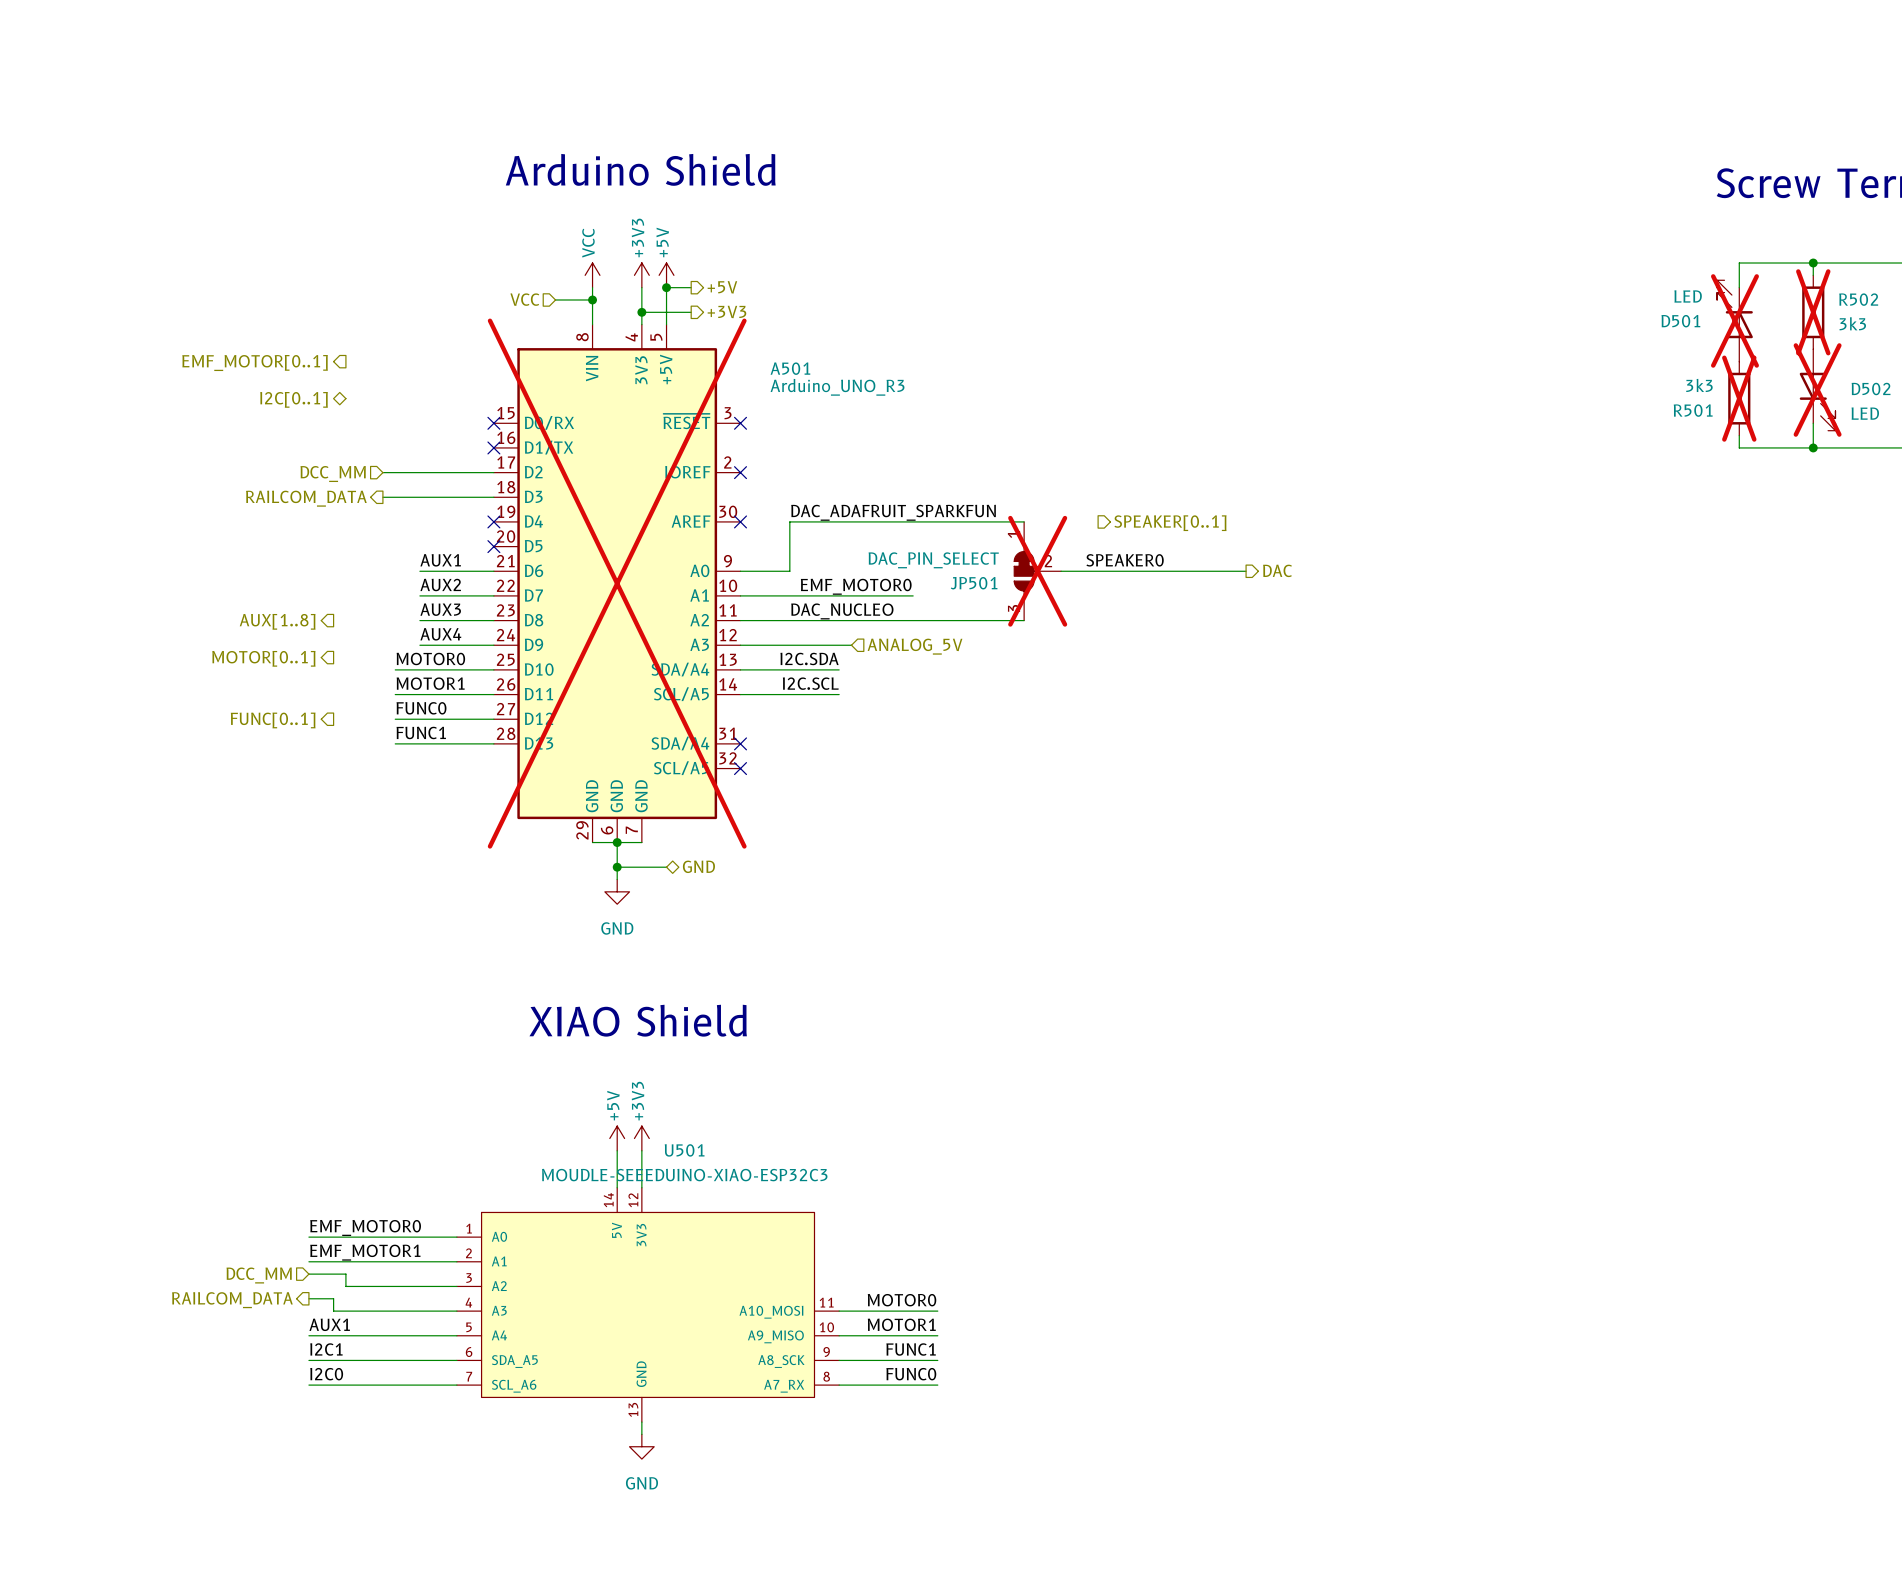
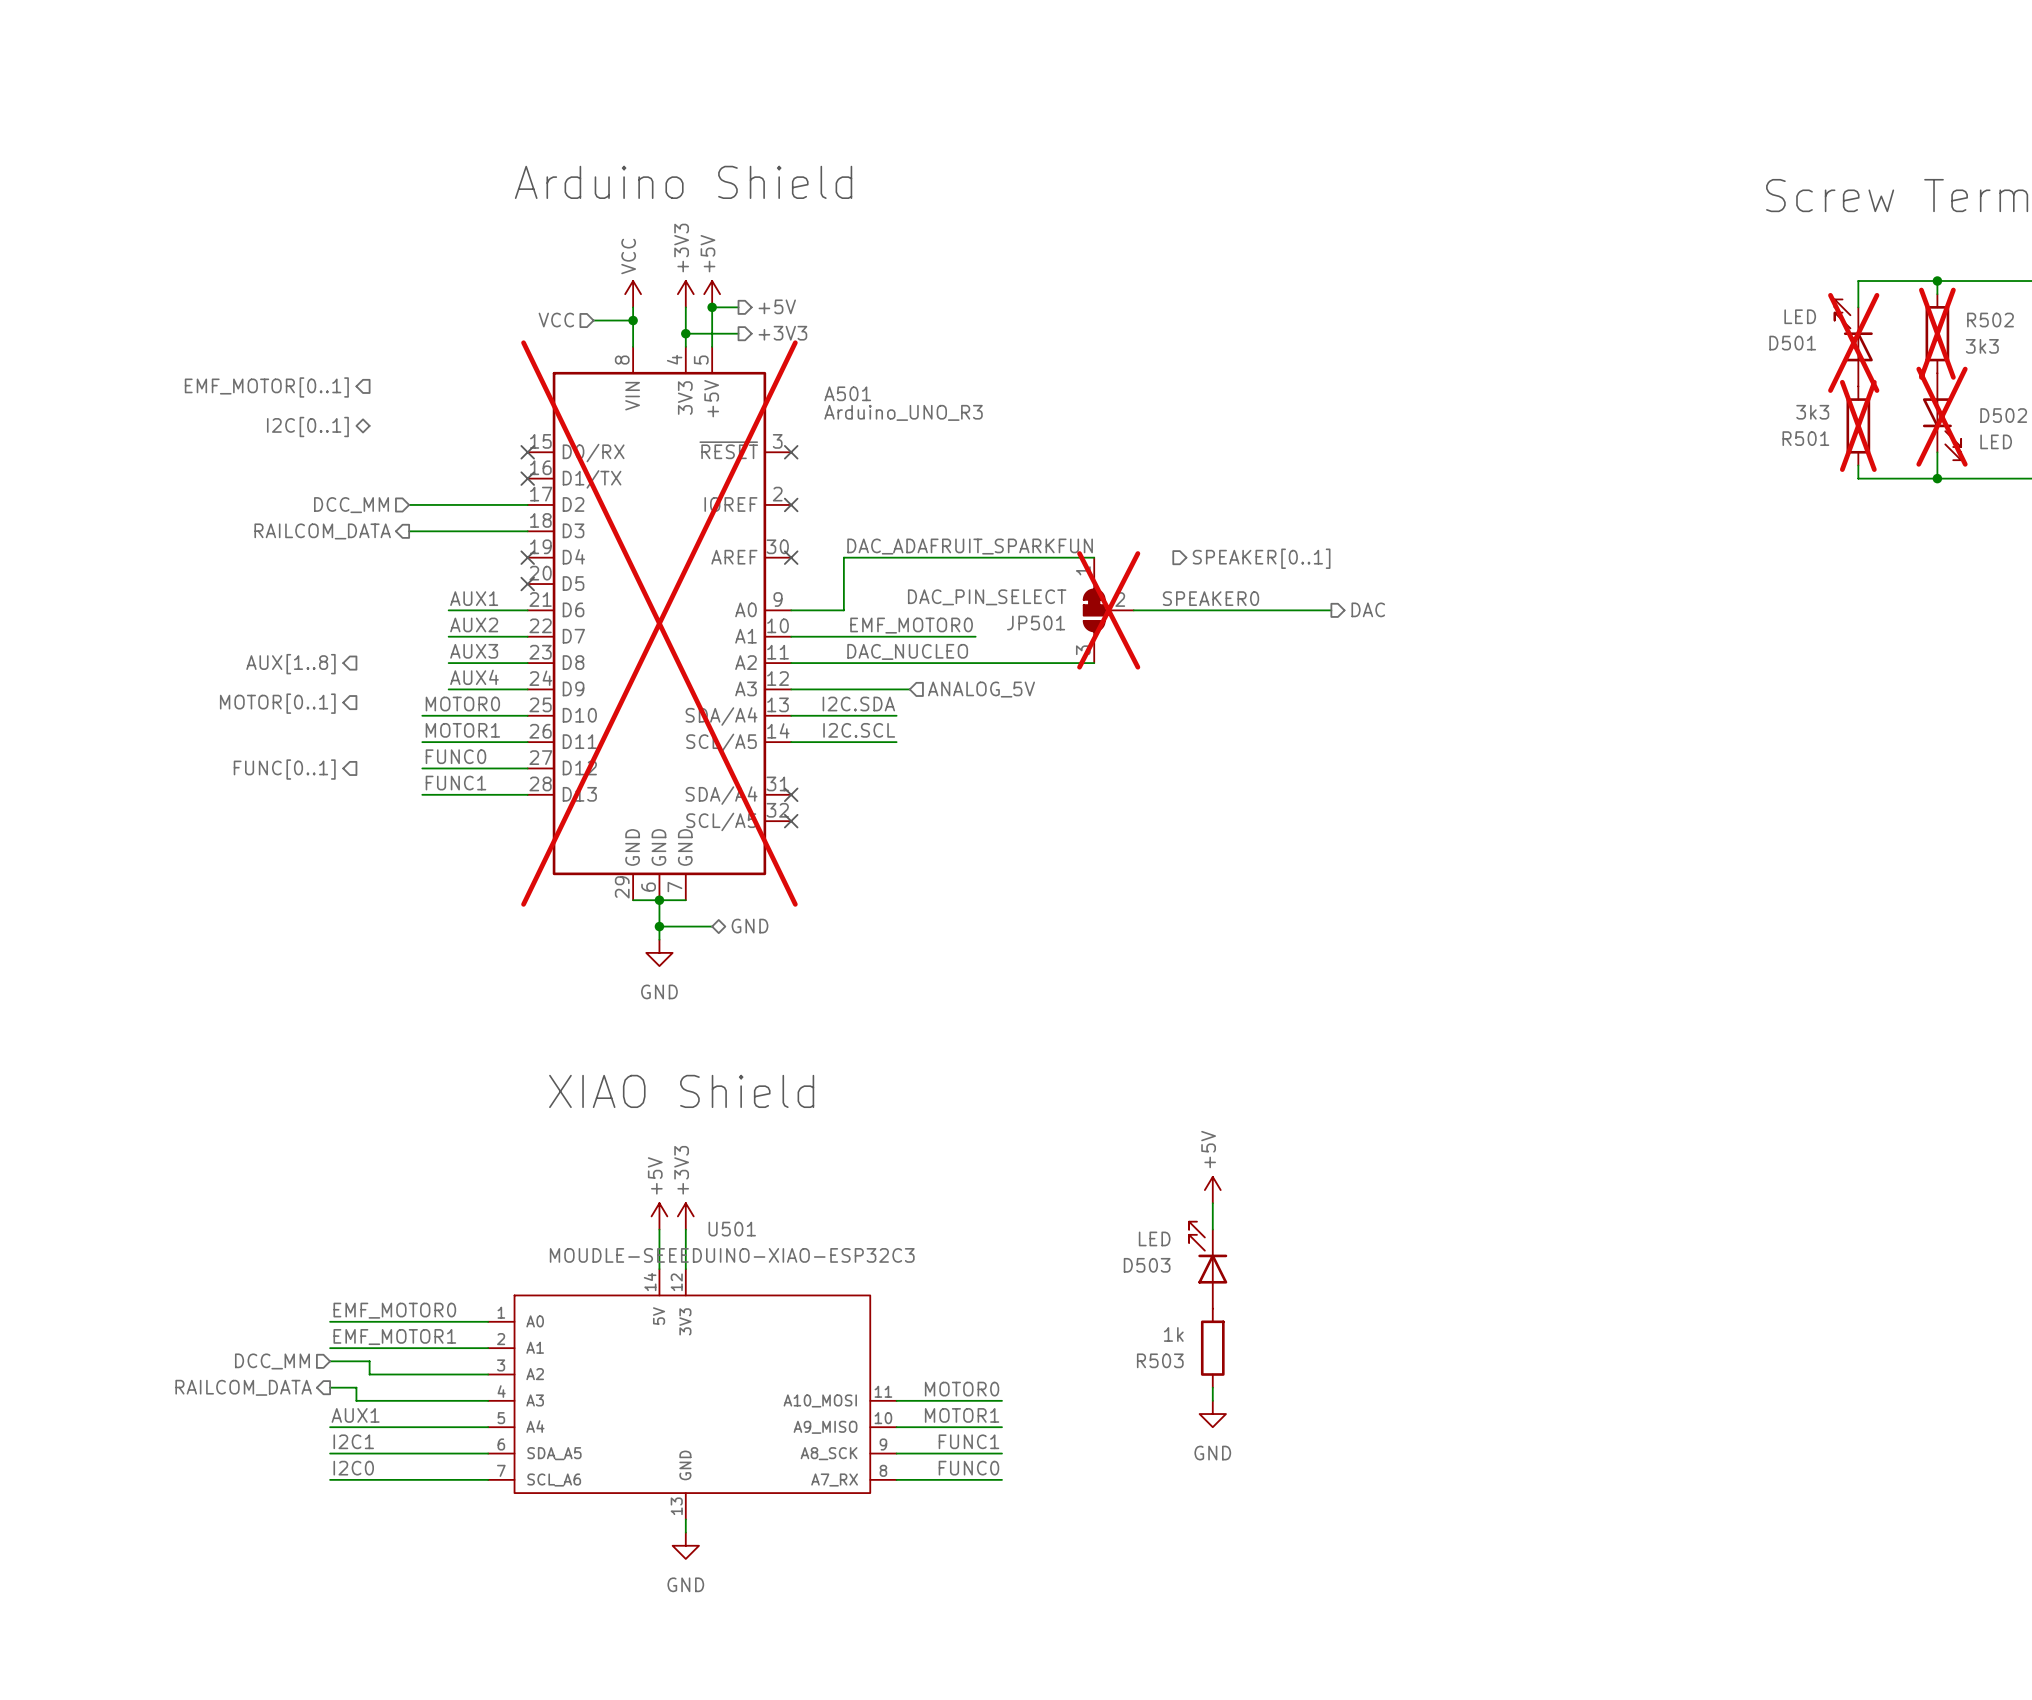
power symbol: none -> +5V (1212, 1190)
wire: none -> (1212, 1203) (1212, 1229)
D503: none -> LED (1208, 1265)
R503: none -> 1k (1212, 1348)
wire: none -> (1212, 1387) (1212, 1400)
power symbol: none -> GND (1212, 1414)

